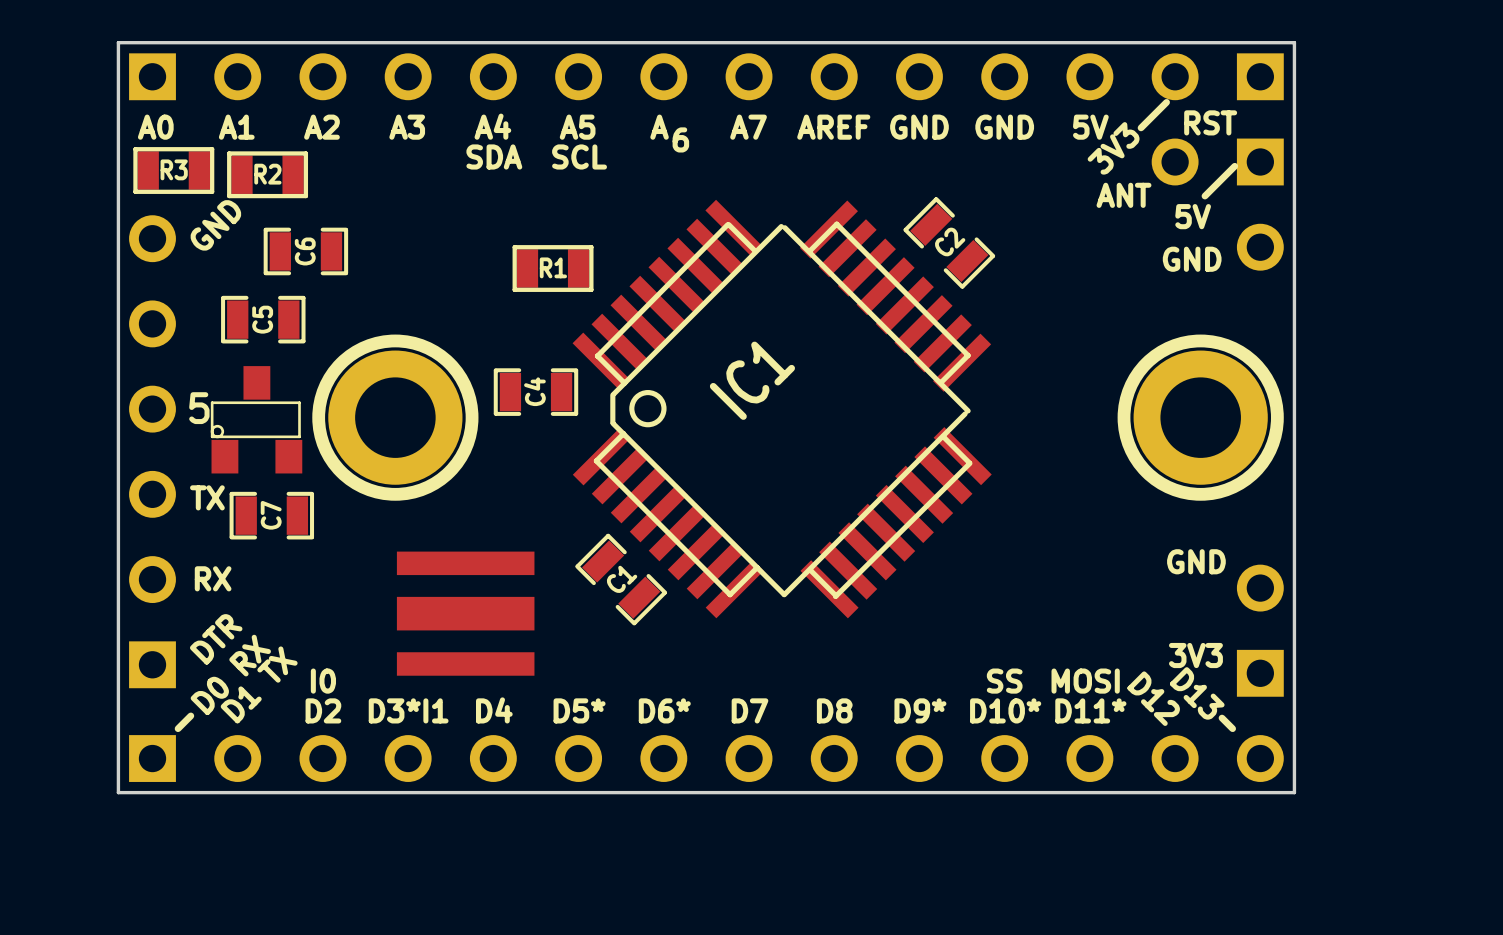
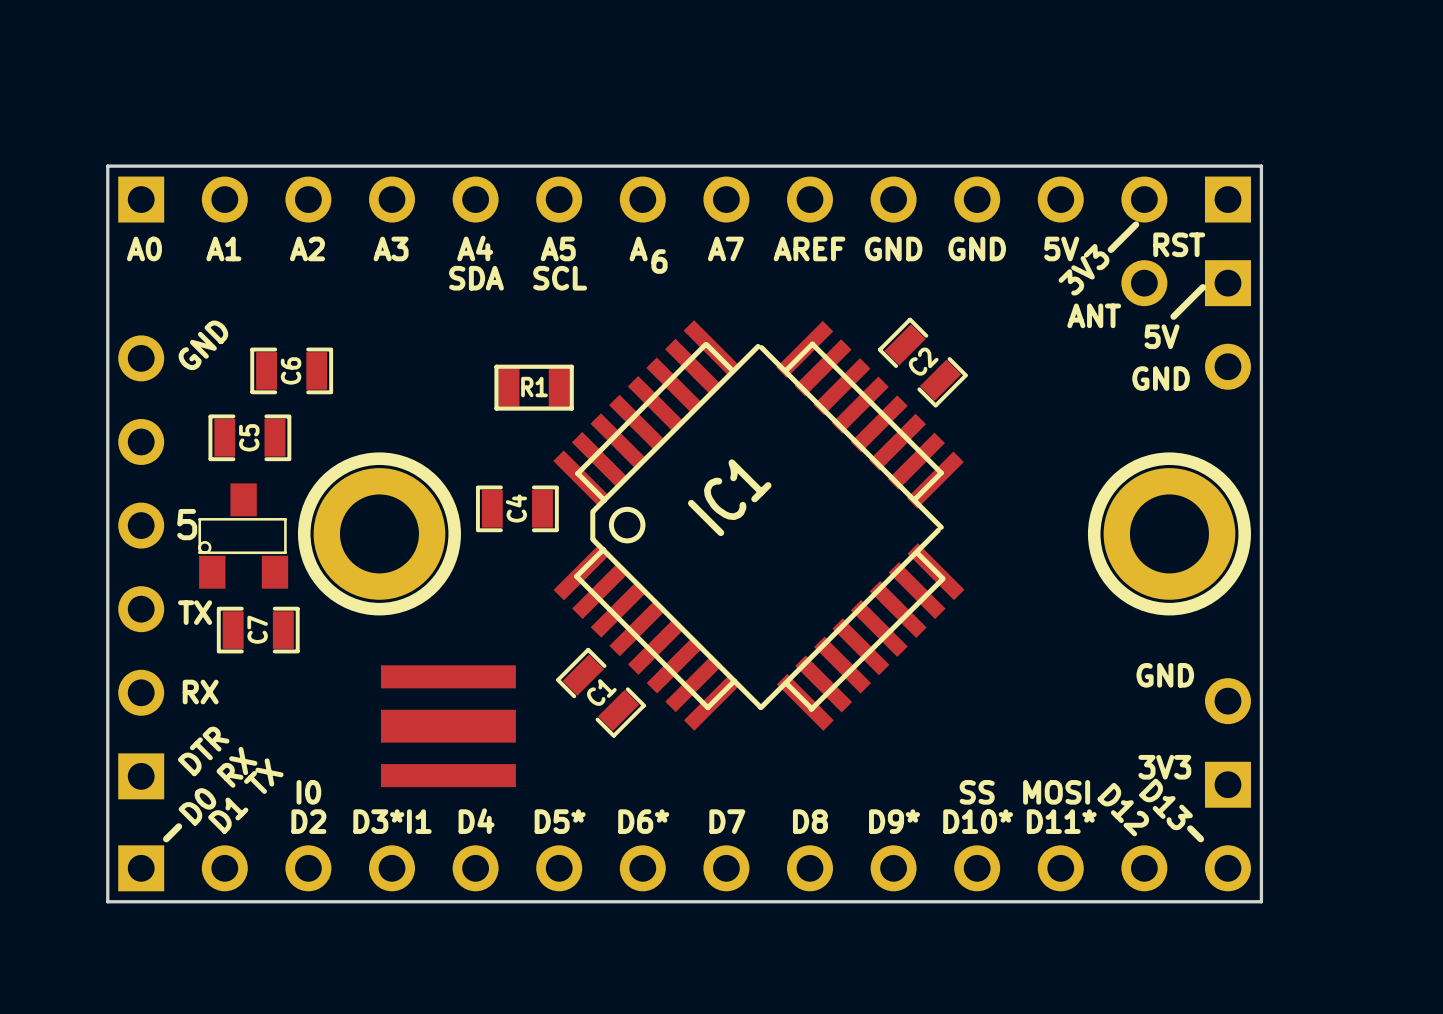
R3: (173, 170) -> none
R2: (267, 174) -> none

